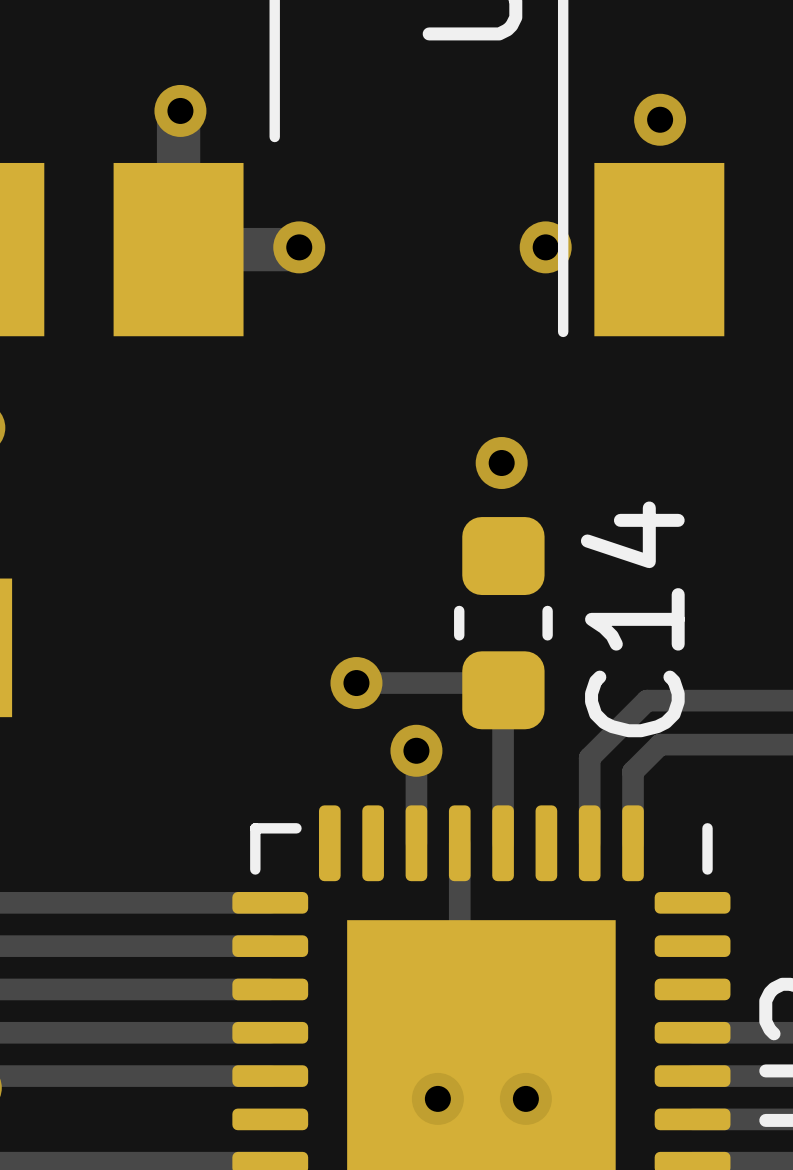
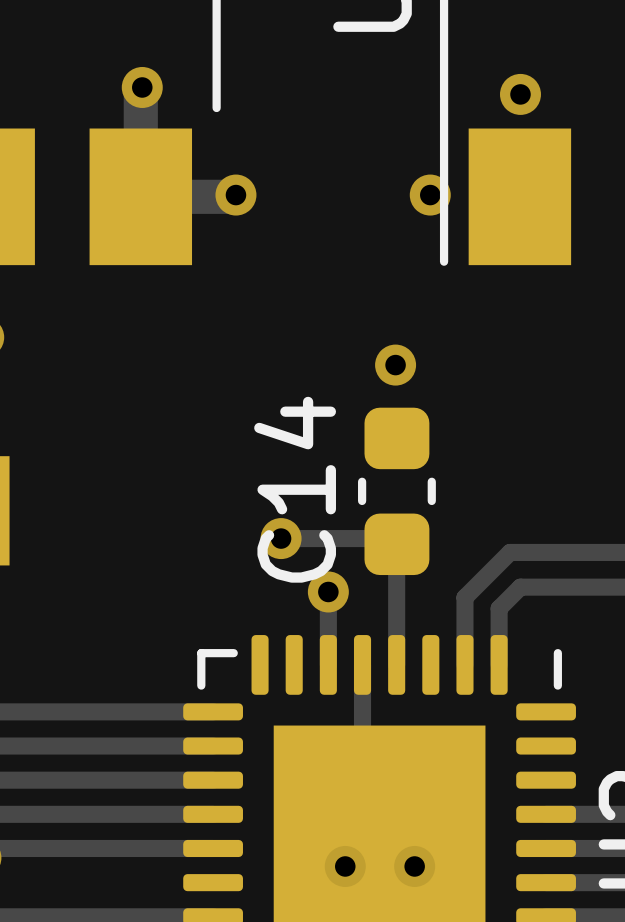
C14 name position: C14 (632, 619) -> C14 (295, 489)

